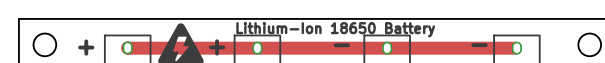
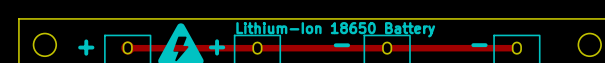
top track width: thick (127, 48) (515, 48) -> thin (127, 48) (515, 48)

